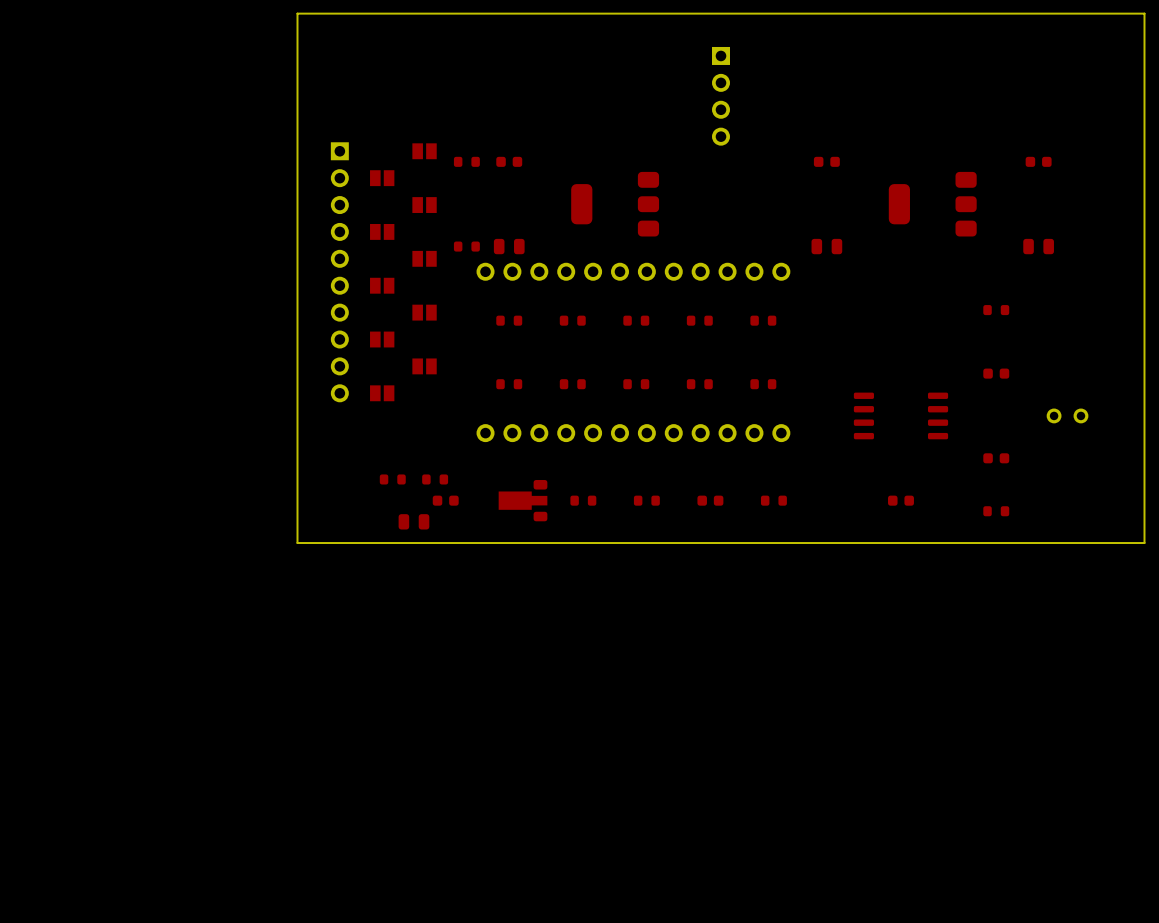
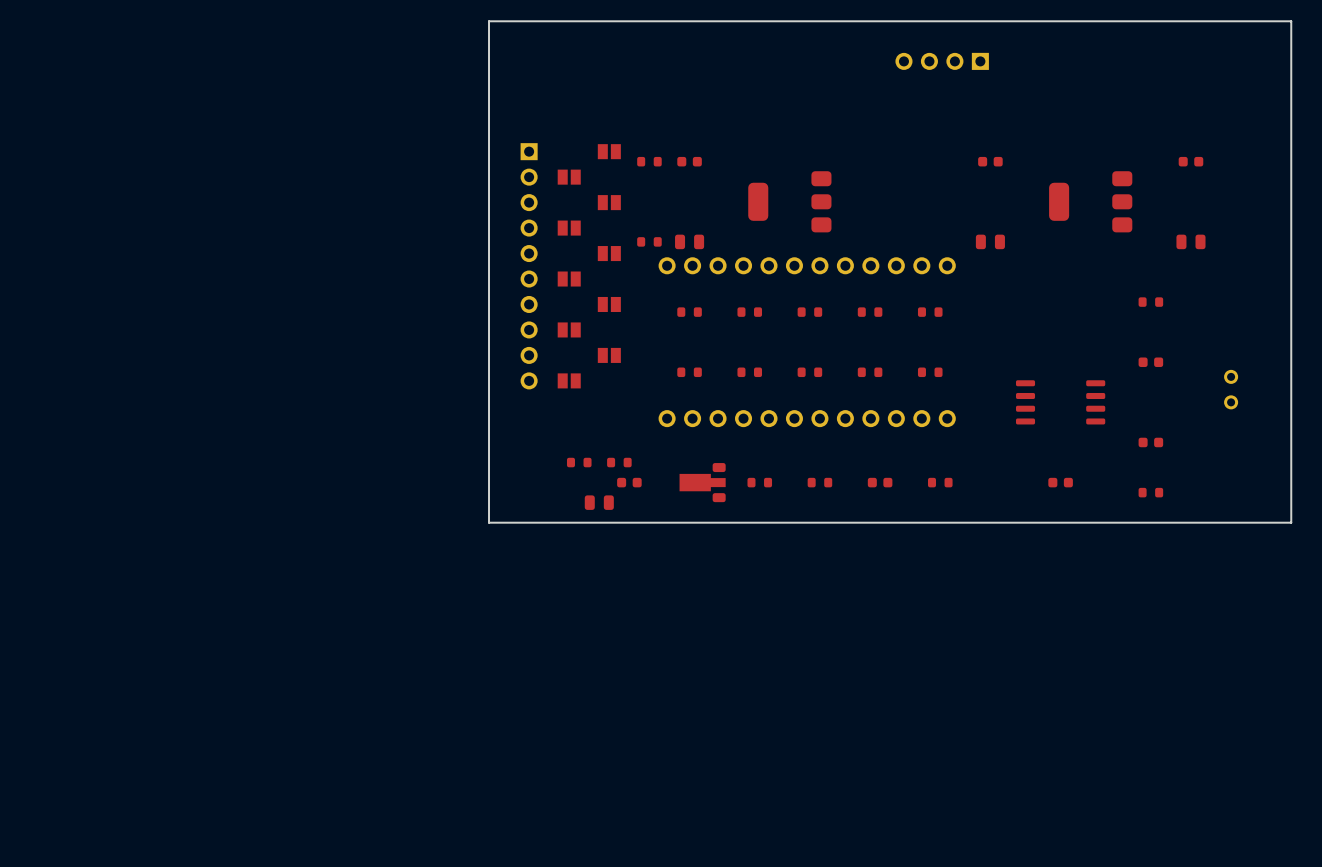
part rotation: 0° (720, 96) -> 90° clockwise (942, 61)
part position: (720, 96) -> (942, 61)
part rotation: 0° (1067, 415) -> 90° clockwise (1231, 389)

